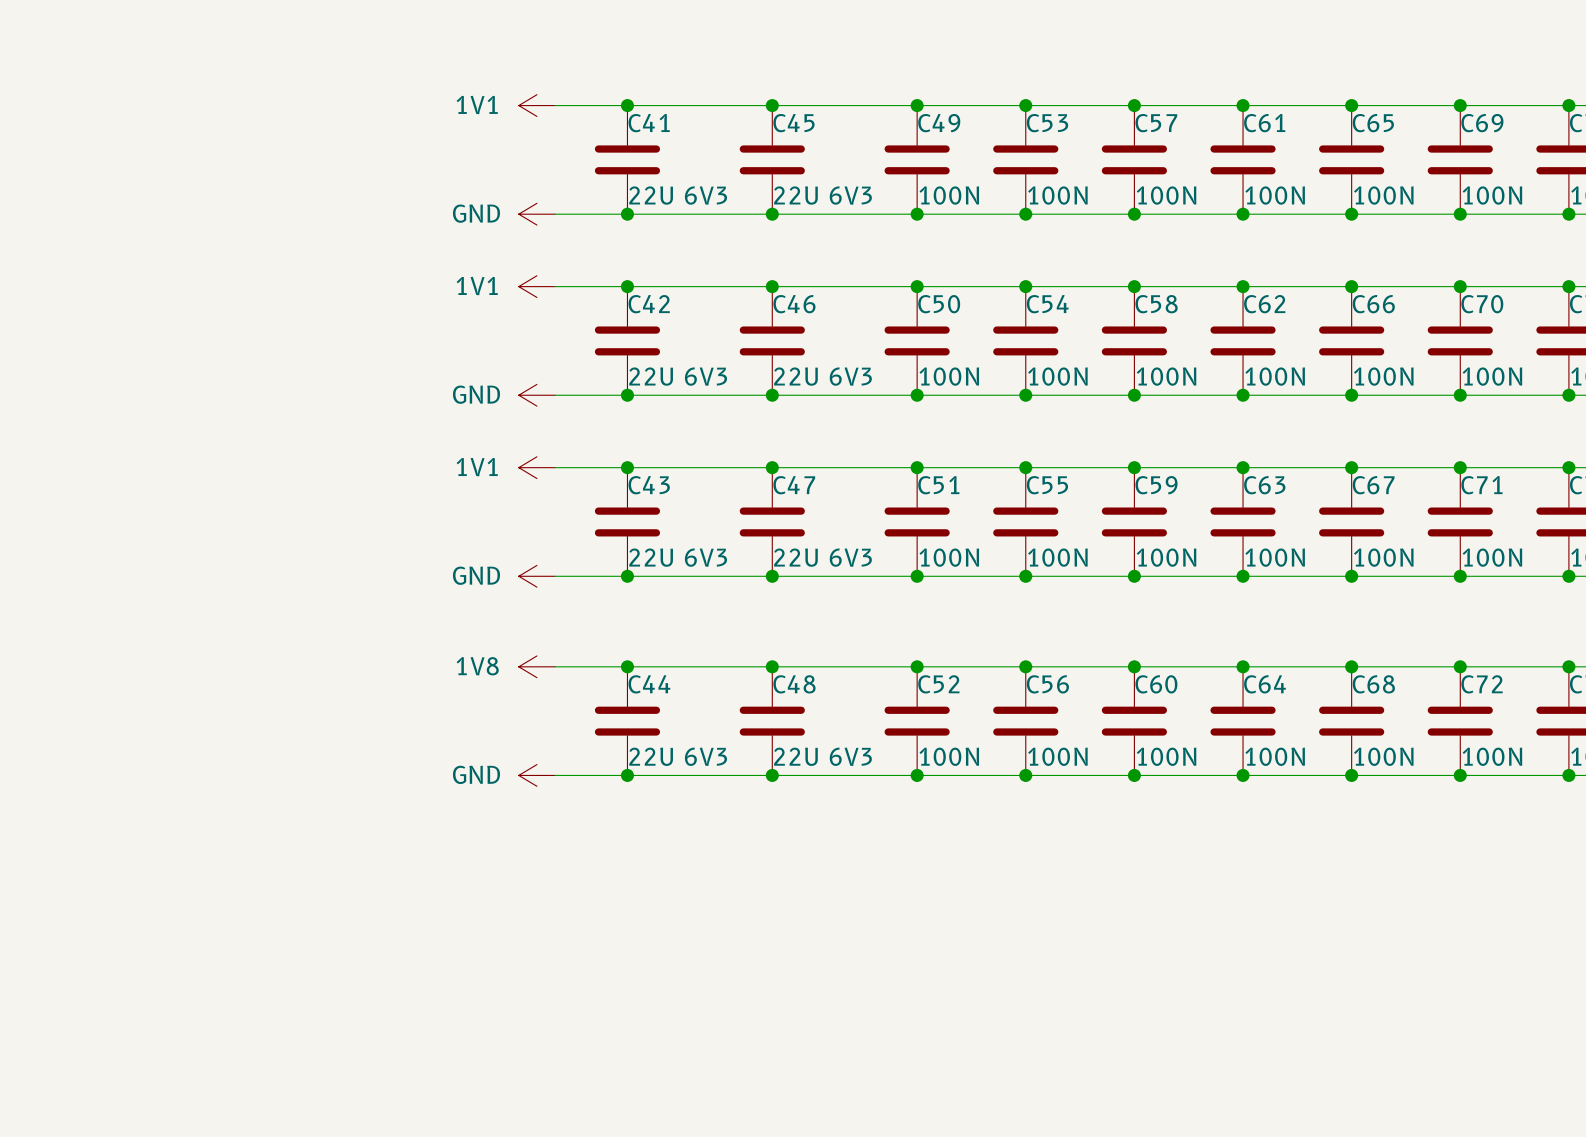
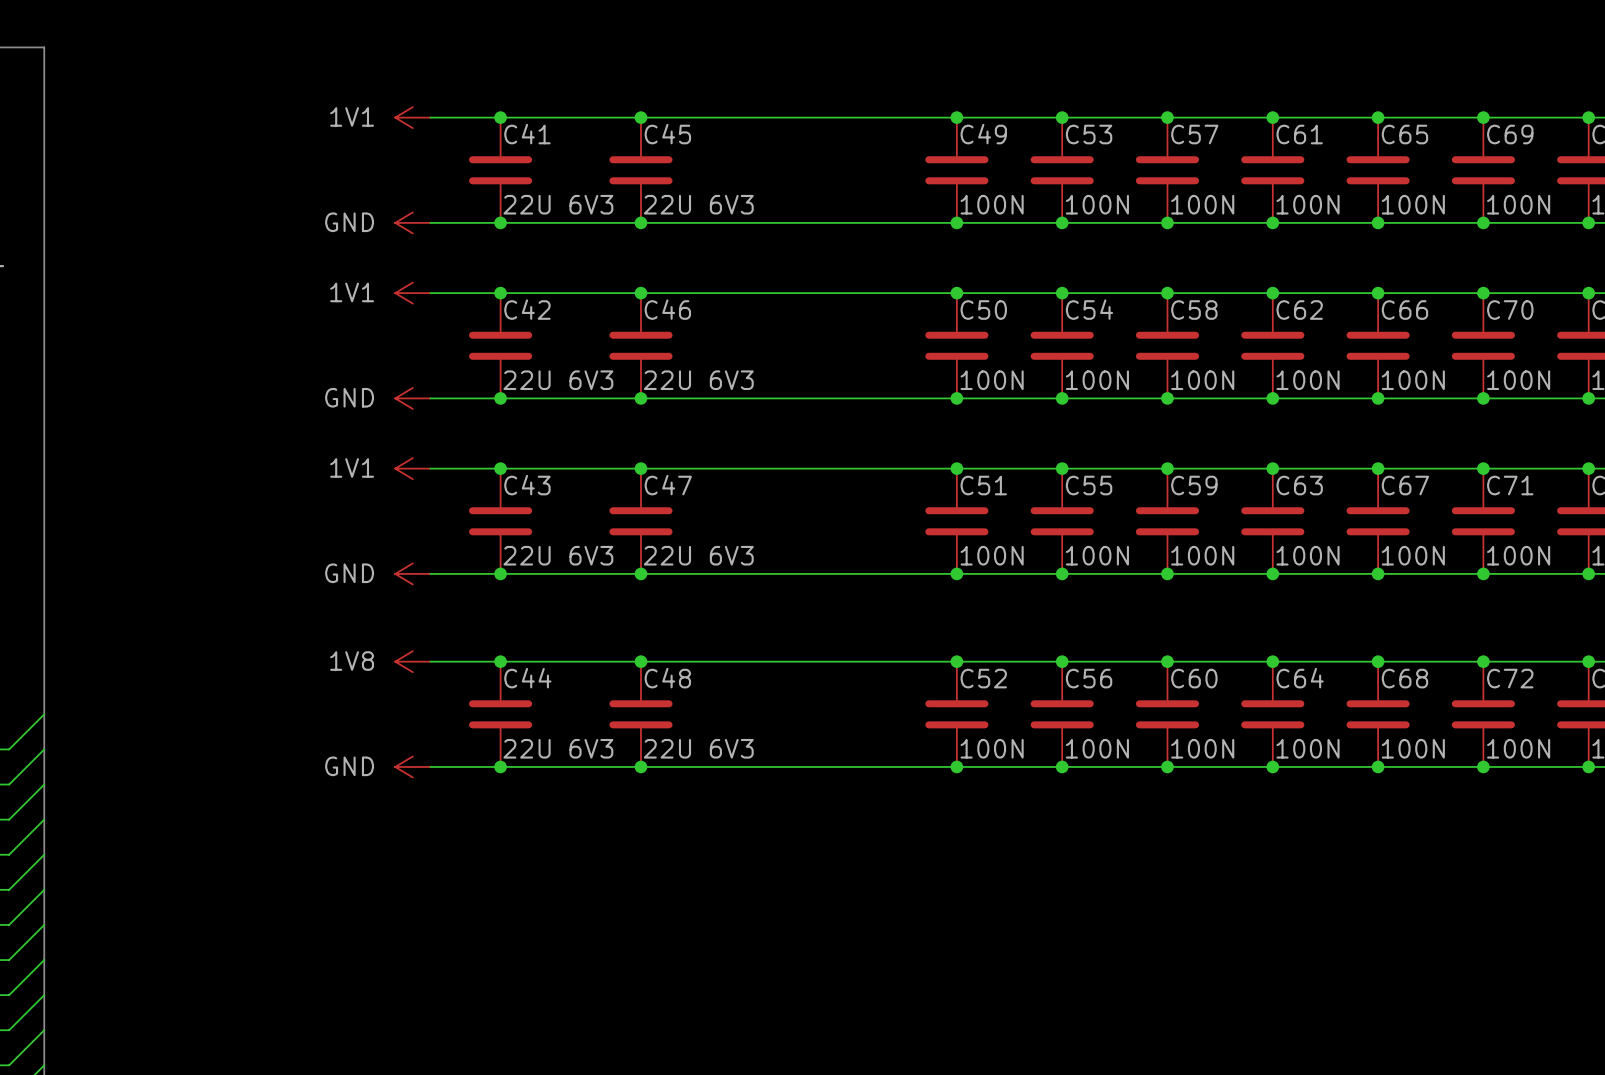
power symbol: none -> 1V1 (412, 117)
wire: none -> (430, 117) (605, 117)
junction: none -> (500, 117)
power symbol: 1V1 (536, 105) -> none
junction position: (627, 105) -> (640, 117)
junction: (772, 105) -> none
C41 position: (627, 159) -> (500, 170)
C45 position: (772, 159) -> (640, 170)
power symbol: none -> GND (412, 222)
wire: none -> (430, 222) (605, 222)
junction: none -> (500, 222)
power symbol: GND (536, 214) -> none
junction position: (627, 214) -> (640, 222)
junction: (772, 214) -> none
power symbol: none -> 1V1 (412, 293)
wire: none -> (430, 293) (605, 293)
junction: none -> (500, 293)
power symbol: 1V1 (536, 286) -> none
junction position: (627, 286) -> (640, 293)
junction: (772, 286) -> none
C42 position: (627, 340) -> (500, 345)
C46 position: (772, 340) -> (640, 345)
power symbol: none -> GND (412, 398)
wire: none -> (430, 398) (605, 398)
junction: none -> (500, 398)
power symbol: GND (536, 395) -> none
junction position: (627, 395) -> (640, 398)
junction: (772, 395) -> none
power symbol: none -> 1V1 (412, 468)
wire: none -> (430, 468) (605, 468)
junction: none -> (500, 468)
power symbol: 1V1 (536, 467) -> none
junction position: (627, 467) -> (640, 468)
junction: (772, 467) -> none
C43 position: (627, 521) -> (500, 521)
C47 position: (772, 521) -> (640, 521)
power symbol: none -> GND (412, 573)
wire: none -> (430, 573) (605, 573)
junction: none -> (500, 573)
power symbol: GND (536, 576) -> none
junction position: (627, 576) -> (640, 573)
junction: (772, 576) -> none
wire: none -> (430, 661) (605, 661)
junction: none -> (500, 661)
power symbol position: 1V8 (536, 666) -> 1V8 (412, 661)
junction position: (627, 666) -> (640, 661)
junction: (772, 666) -> none
C44 position: (627, 721) -> (500, 714)
C48 position: (772, 721) -> (640, 714)
power symbol: none -> GND (412, 766)
wire: none -> (430, 766) (605, 766)
junction: none -> (500, 766)
power symbol: GND (536, 775) -> none
junction position: (627, 775) -> (640, 766)
junction: (772, 775) -> none

